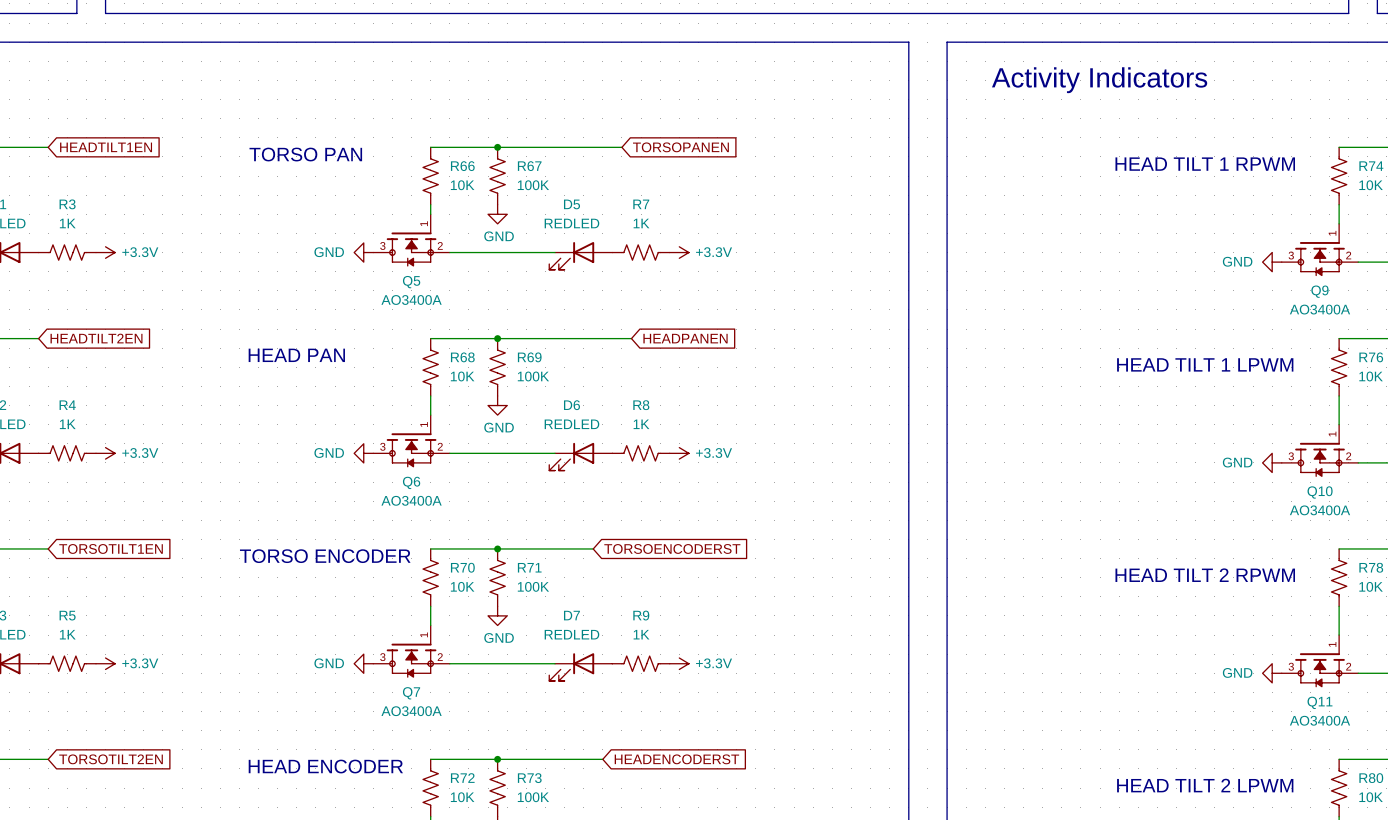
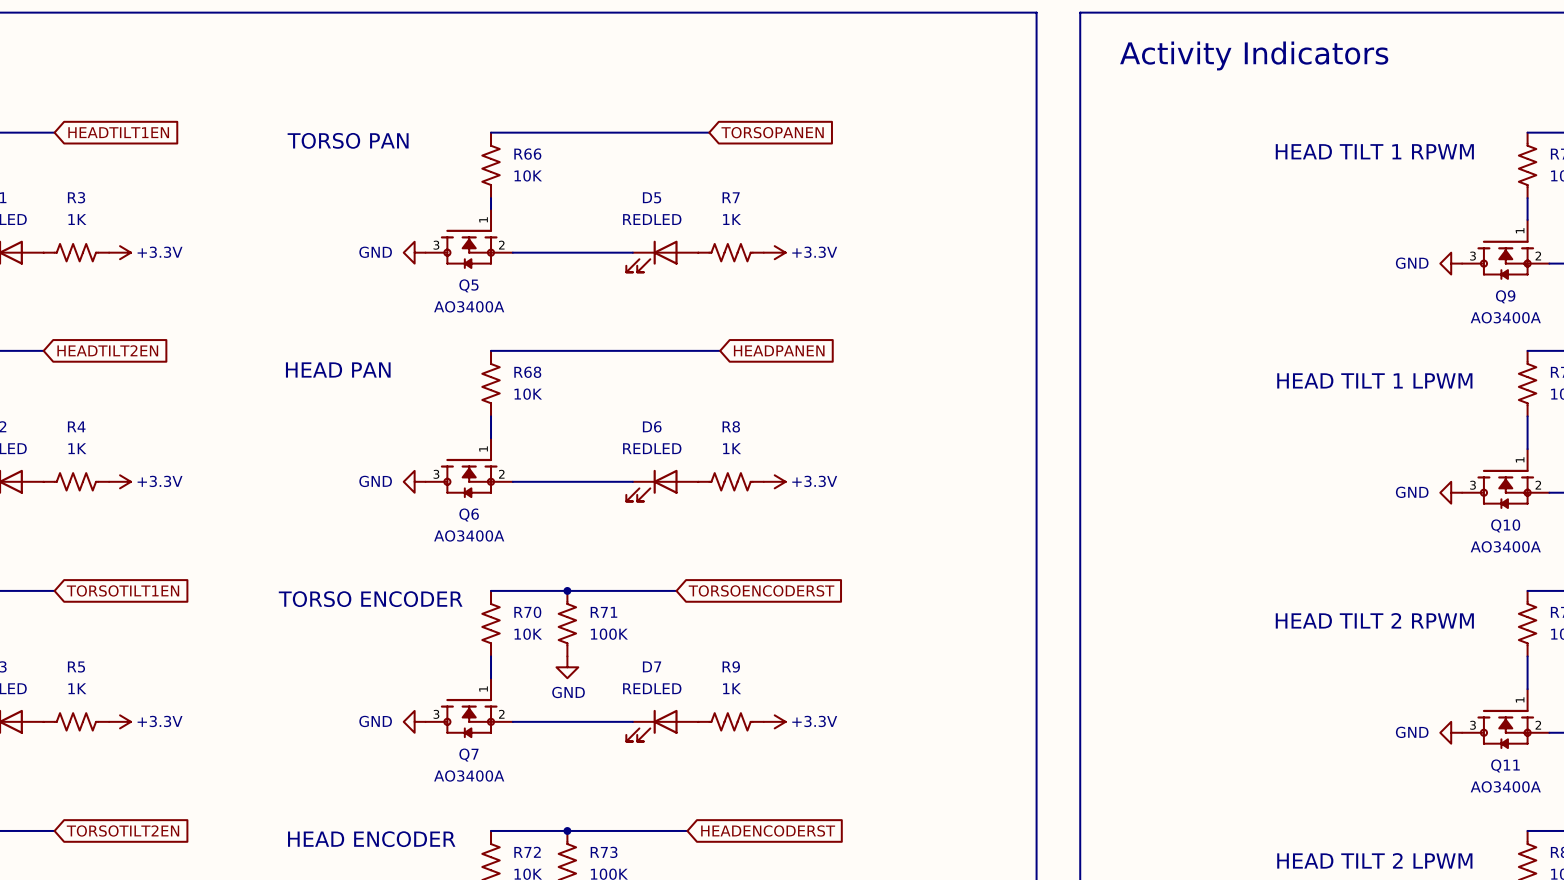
junction: (497, 147) -> none
R67: 100K (497, 176) -> none
power symbol: GND (497, 214) -> none
junction: (497, 338) -> none
R69: 100K (497, 367) -> none
power symbol: GND (497, 405) -> none

